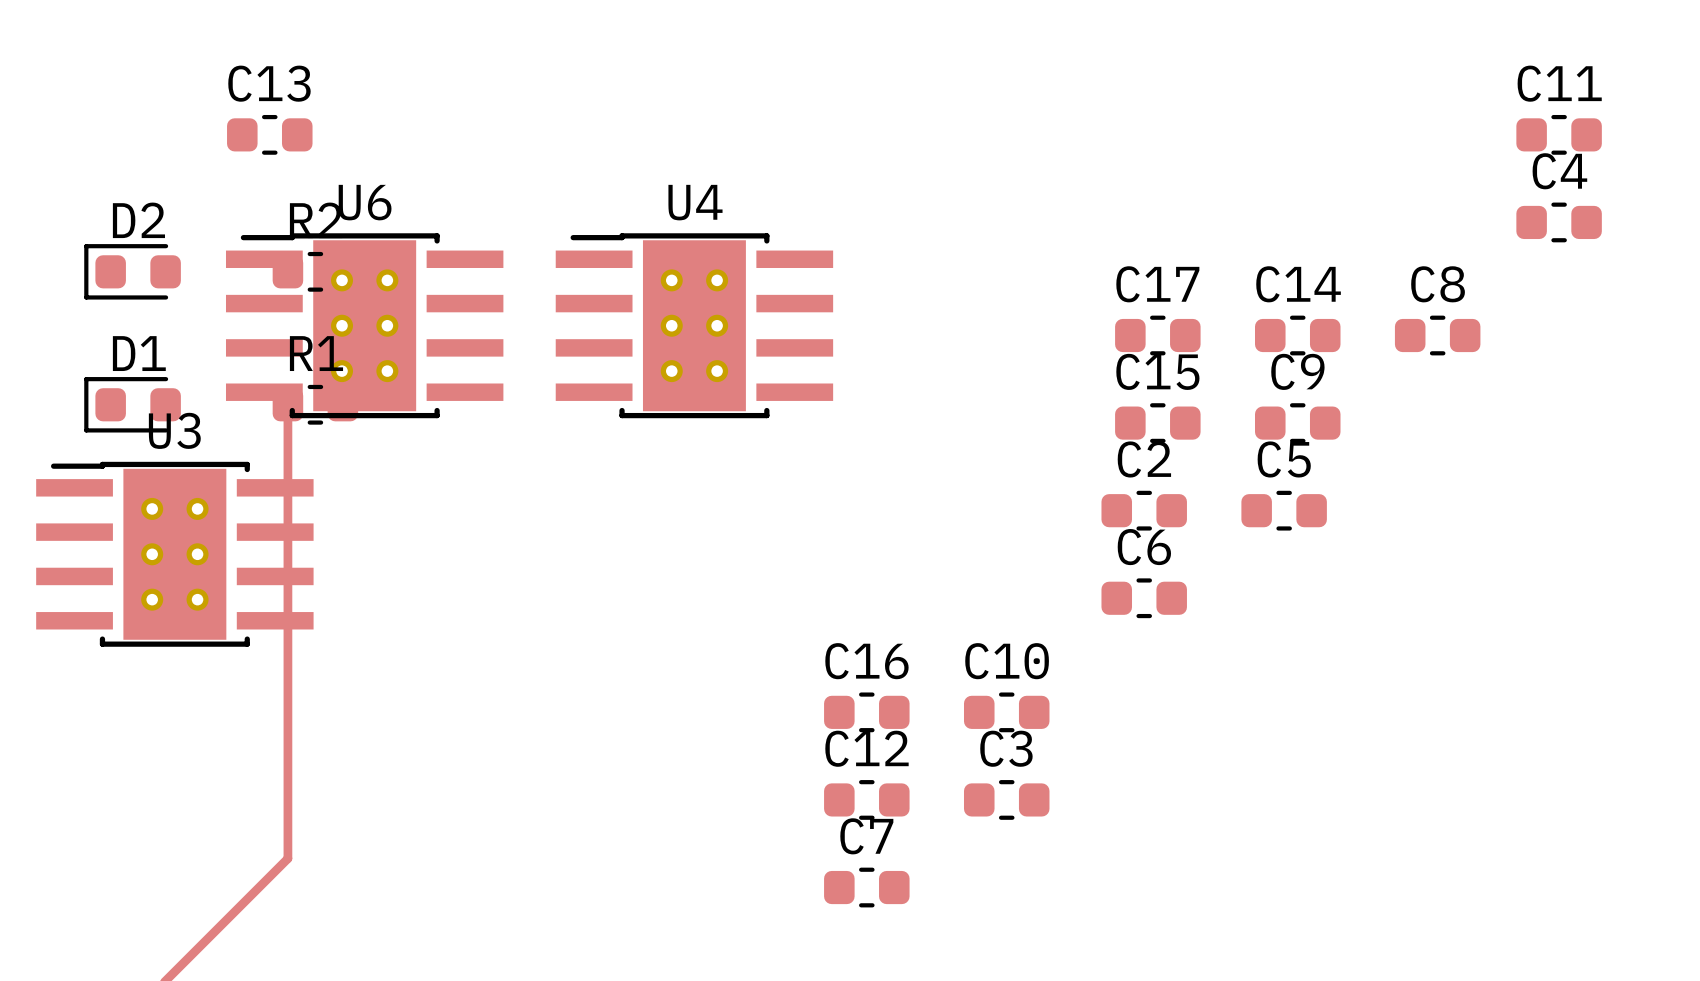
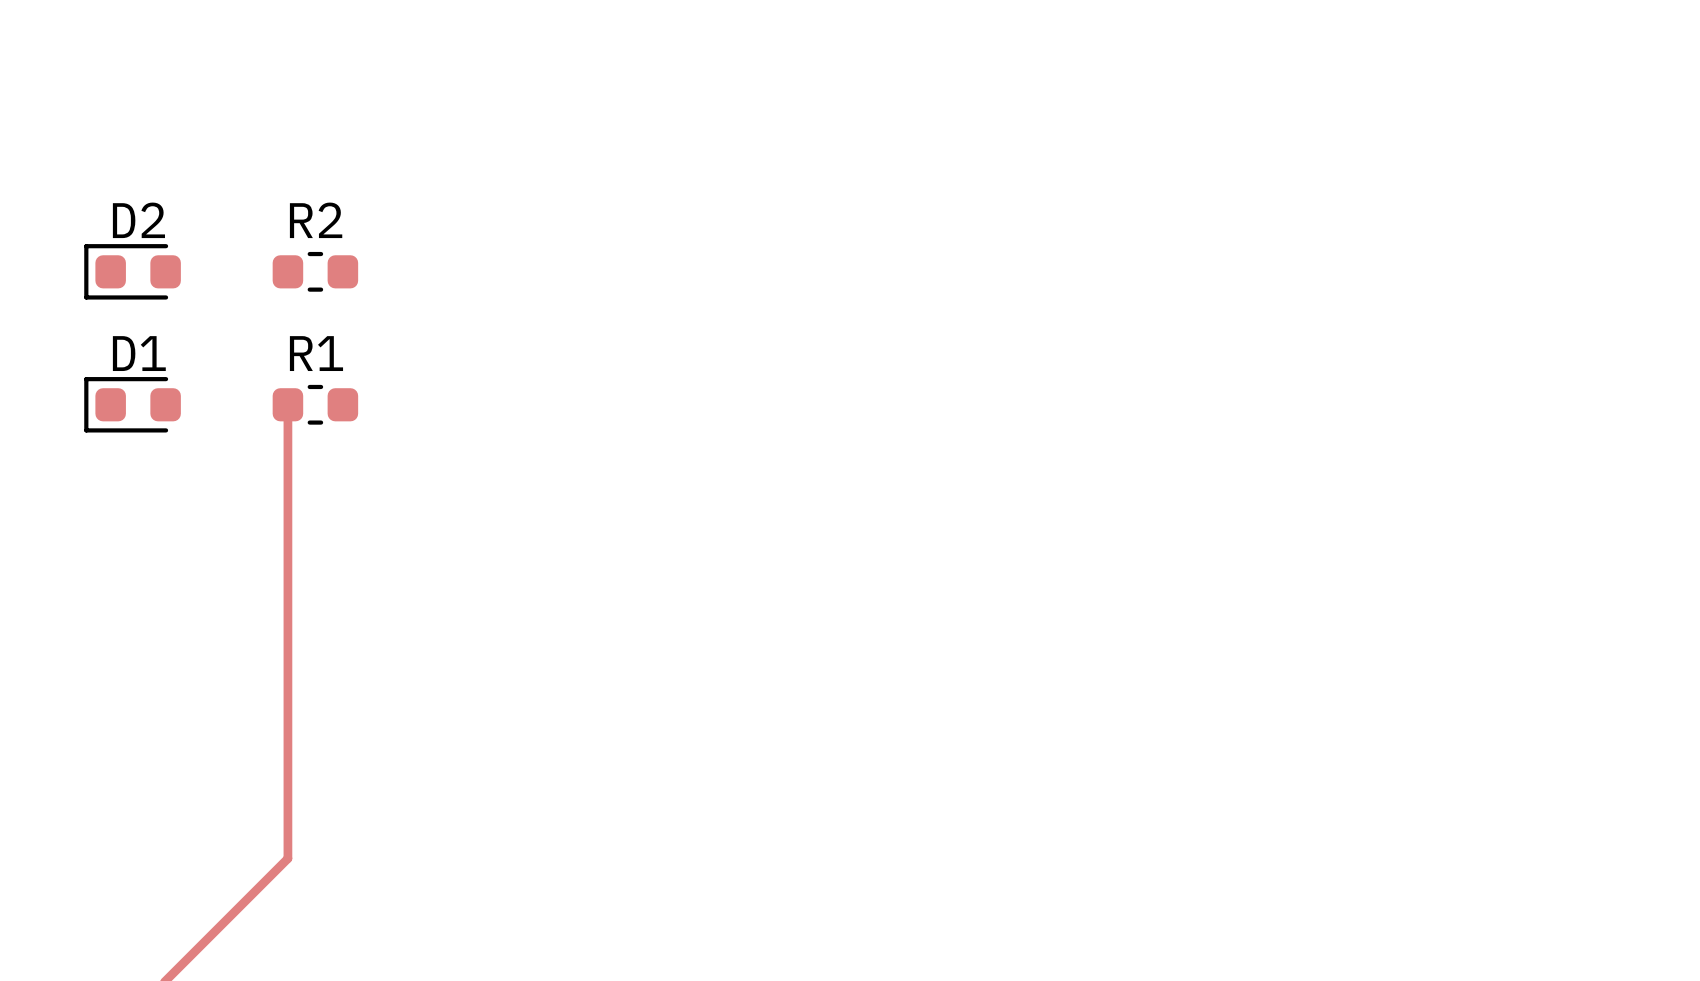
C13: (269, 134) -> none
C11: (1559, 134) -> none
C4: (1559, 222) -> none
U6: (364, 325) -> none
U4: (694, 325) -> none
C17: (1157, 335) -> none
C14: (1297, 335) -> none
C8: (1437, 335) -> none
C15: (1157, 423) -> none
C9: (1297, 423) -> none
C2: (1144, 510) -> none
C5: (1284, 510) -> none
U3: (174, 554) -> none
C6: (1144, 598) -> none
C16: (866, 712) -> none
C10: (1006, 712) -> none
C12: (866, 799) -> none
C3: (1006, 799) -> none
C7: (866, 887) -> none

